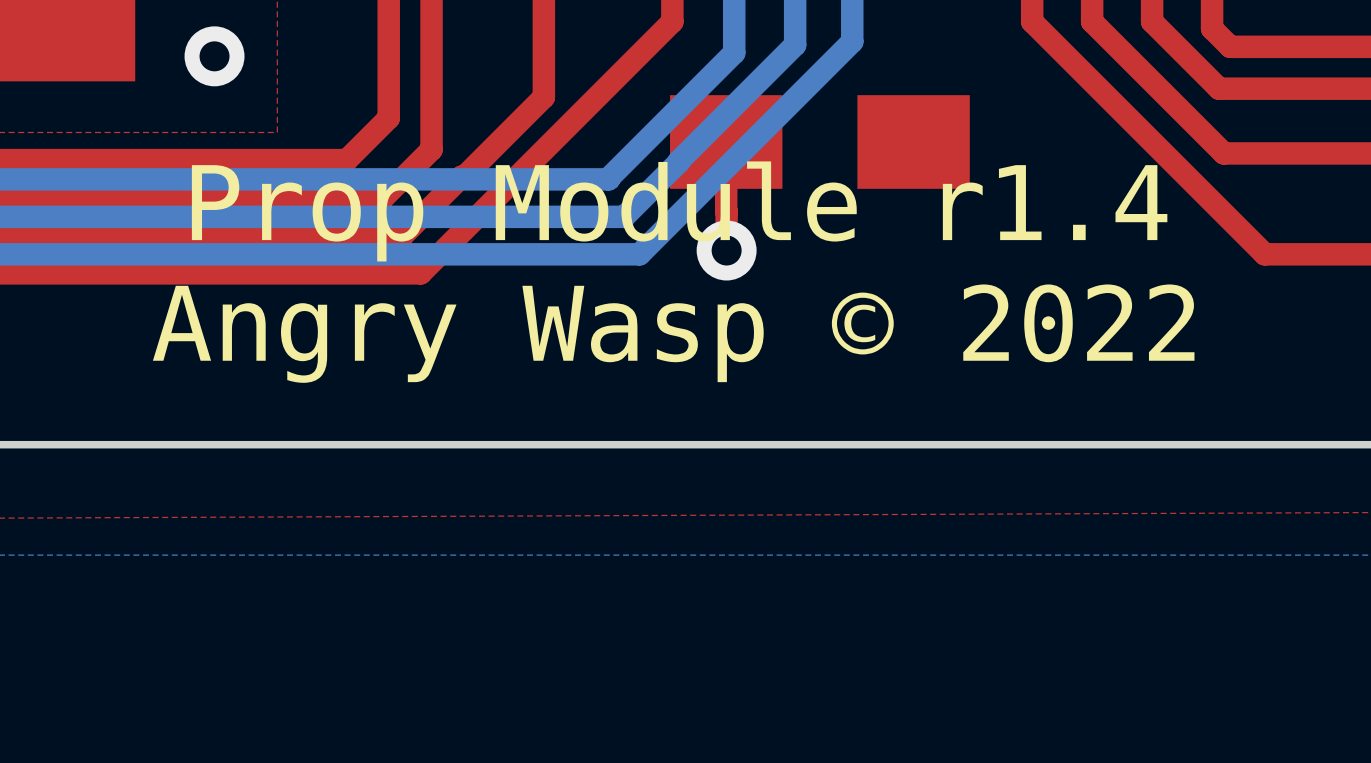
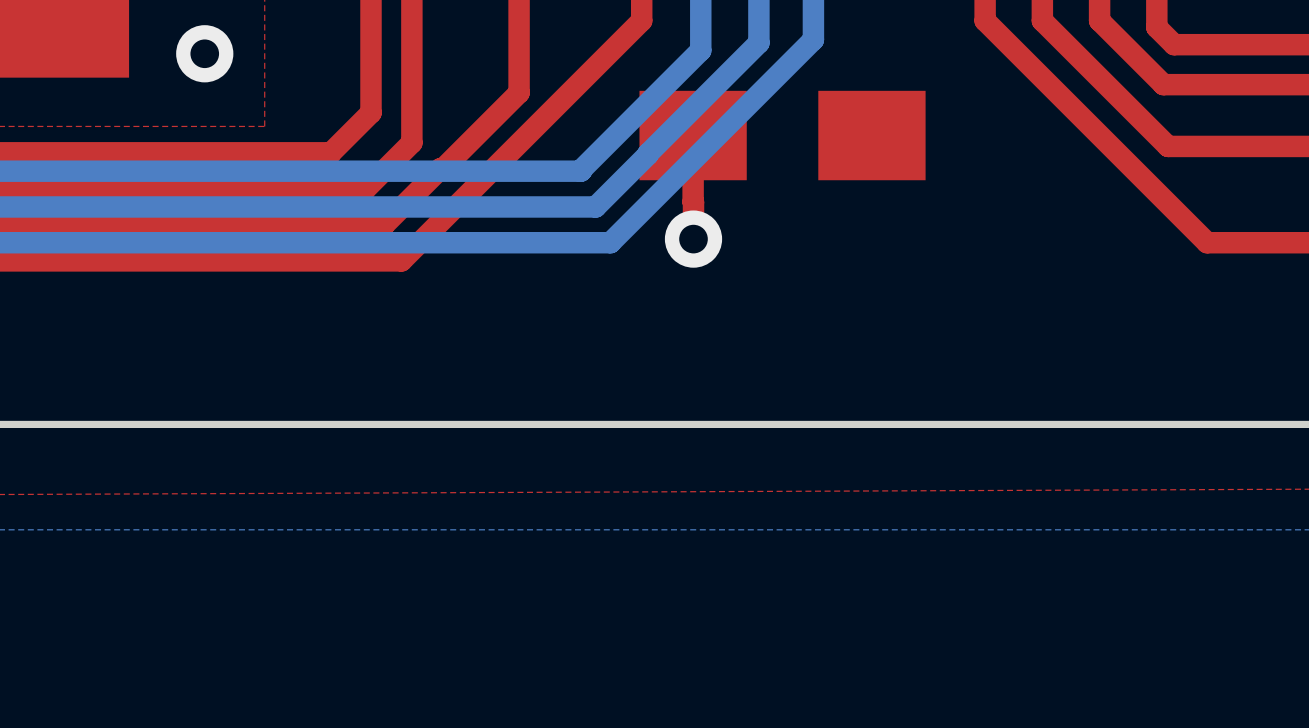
text: Prop Module r1.4 (679, 211) -> none
text: Angry Wasp © 2022 (673, 333) -> none

